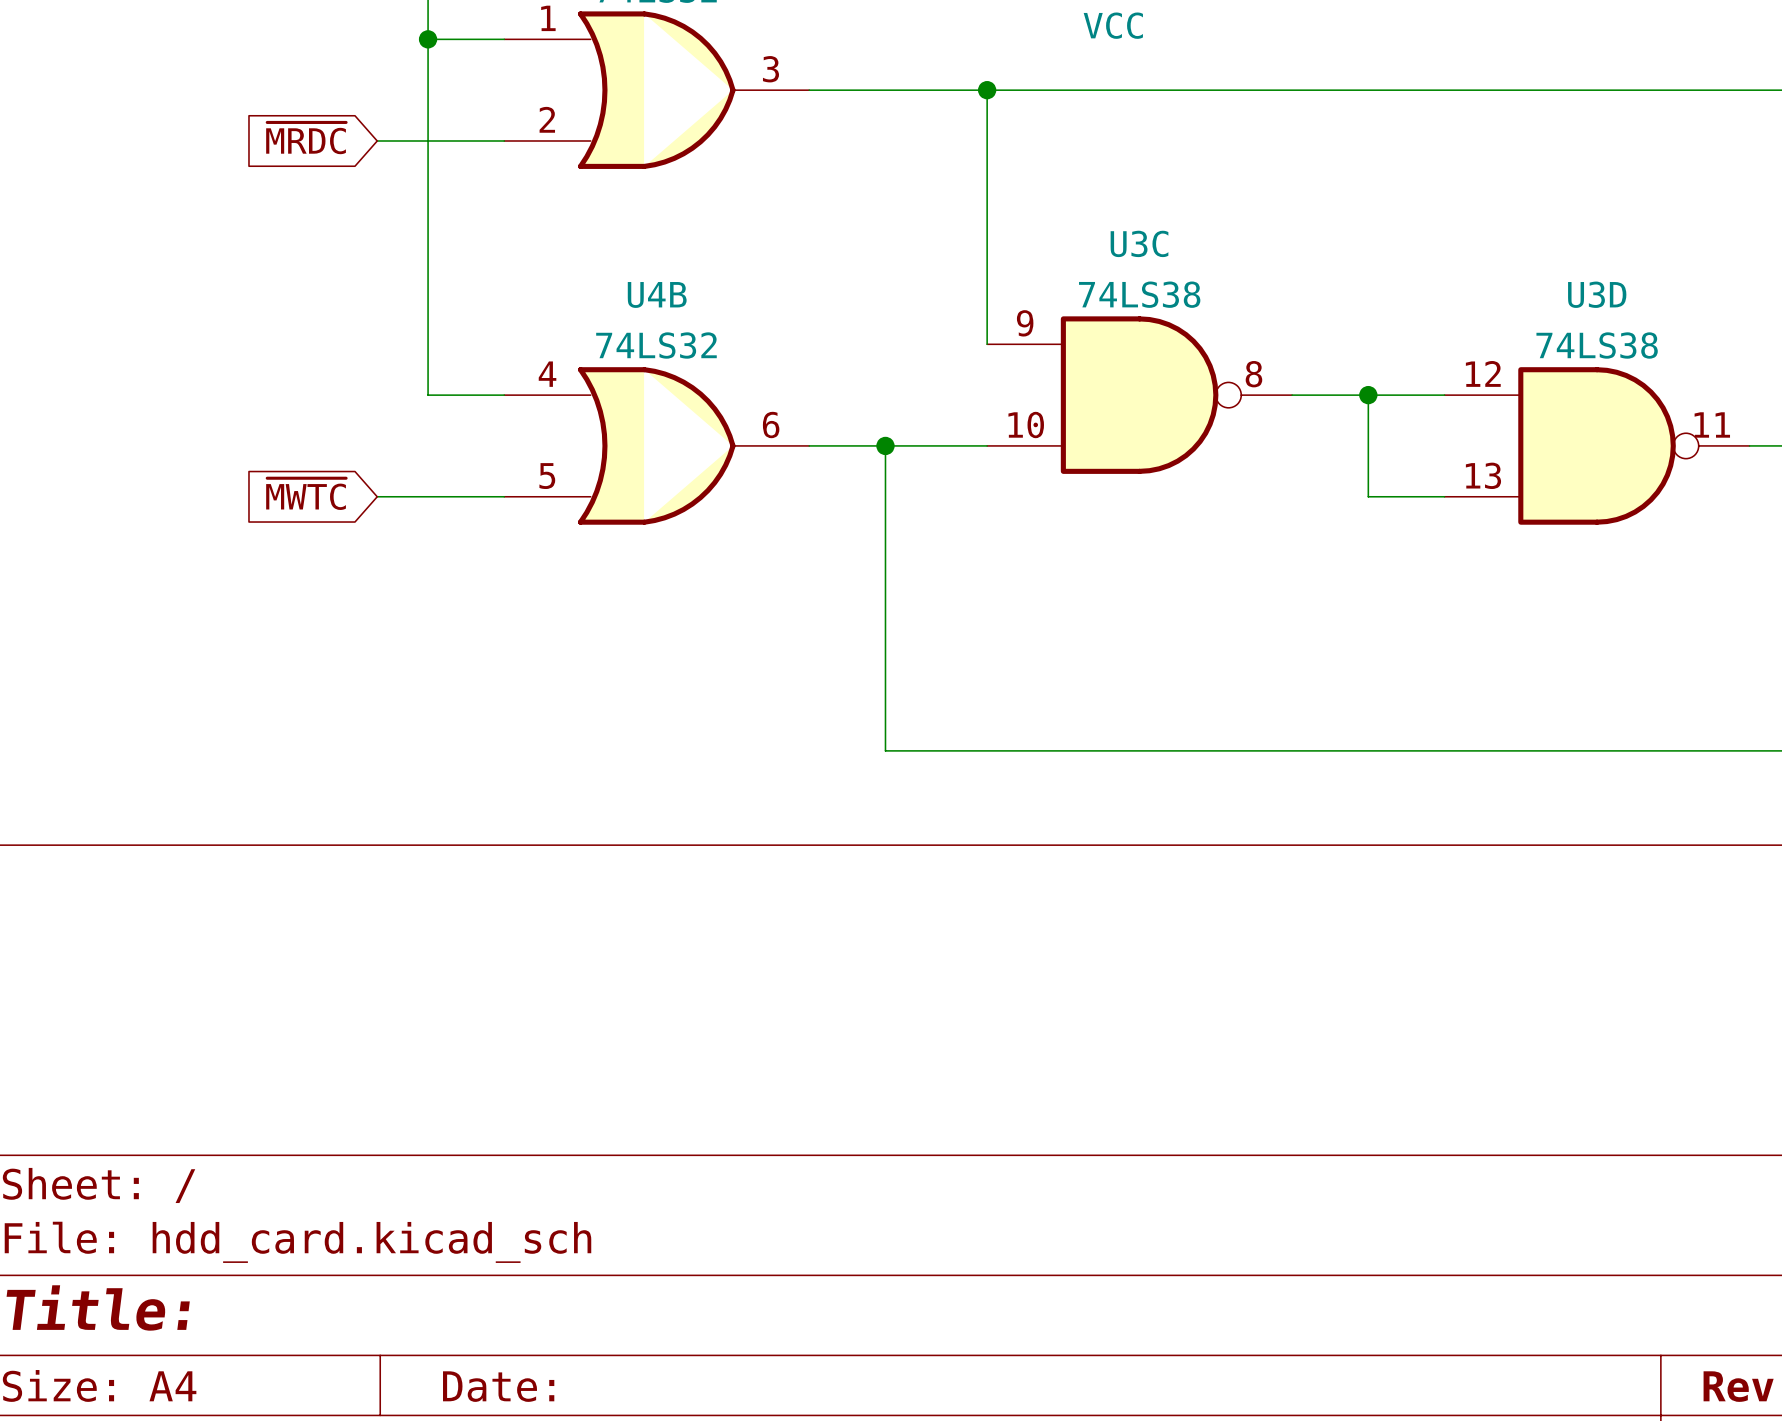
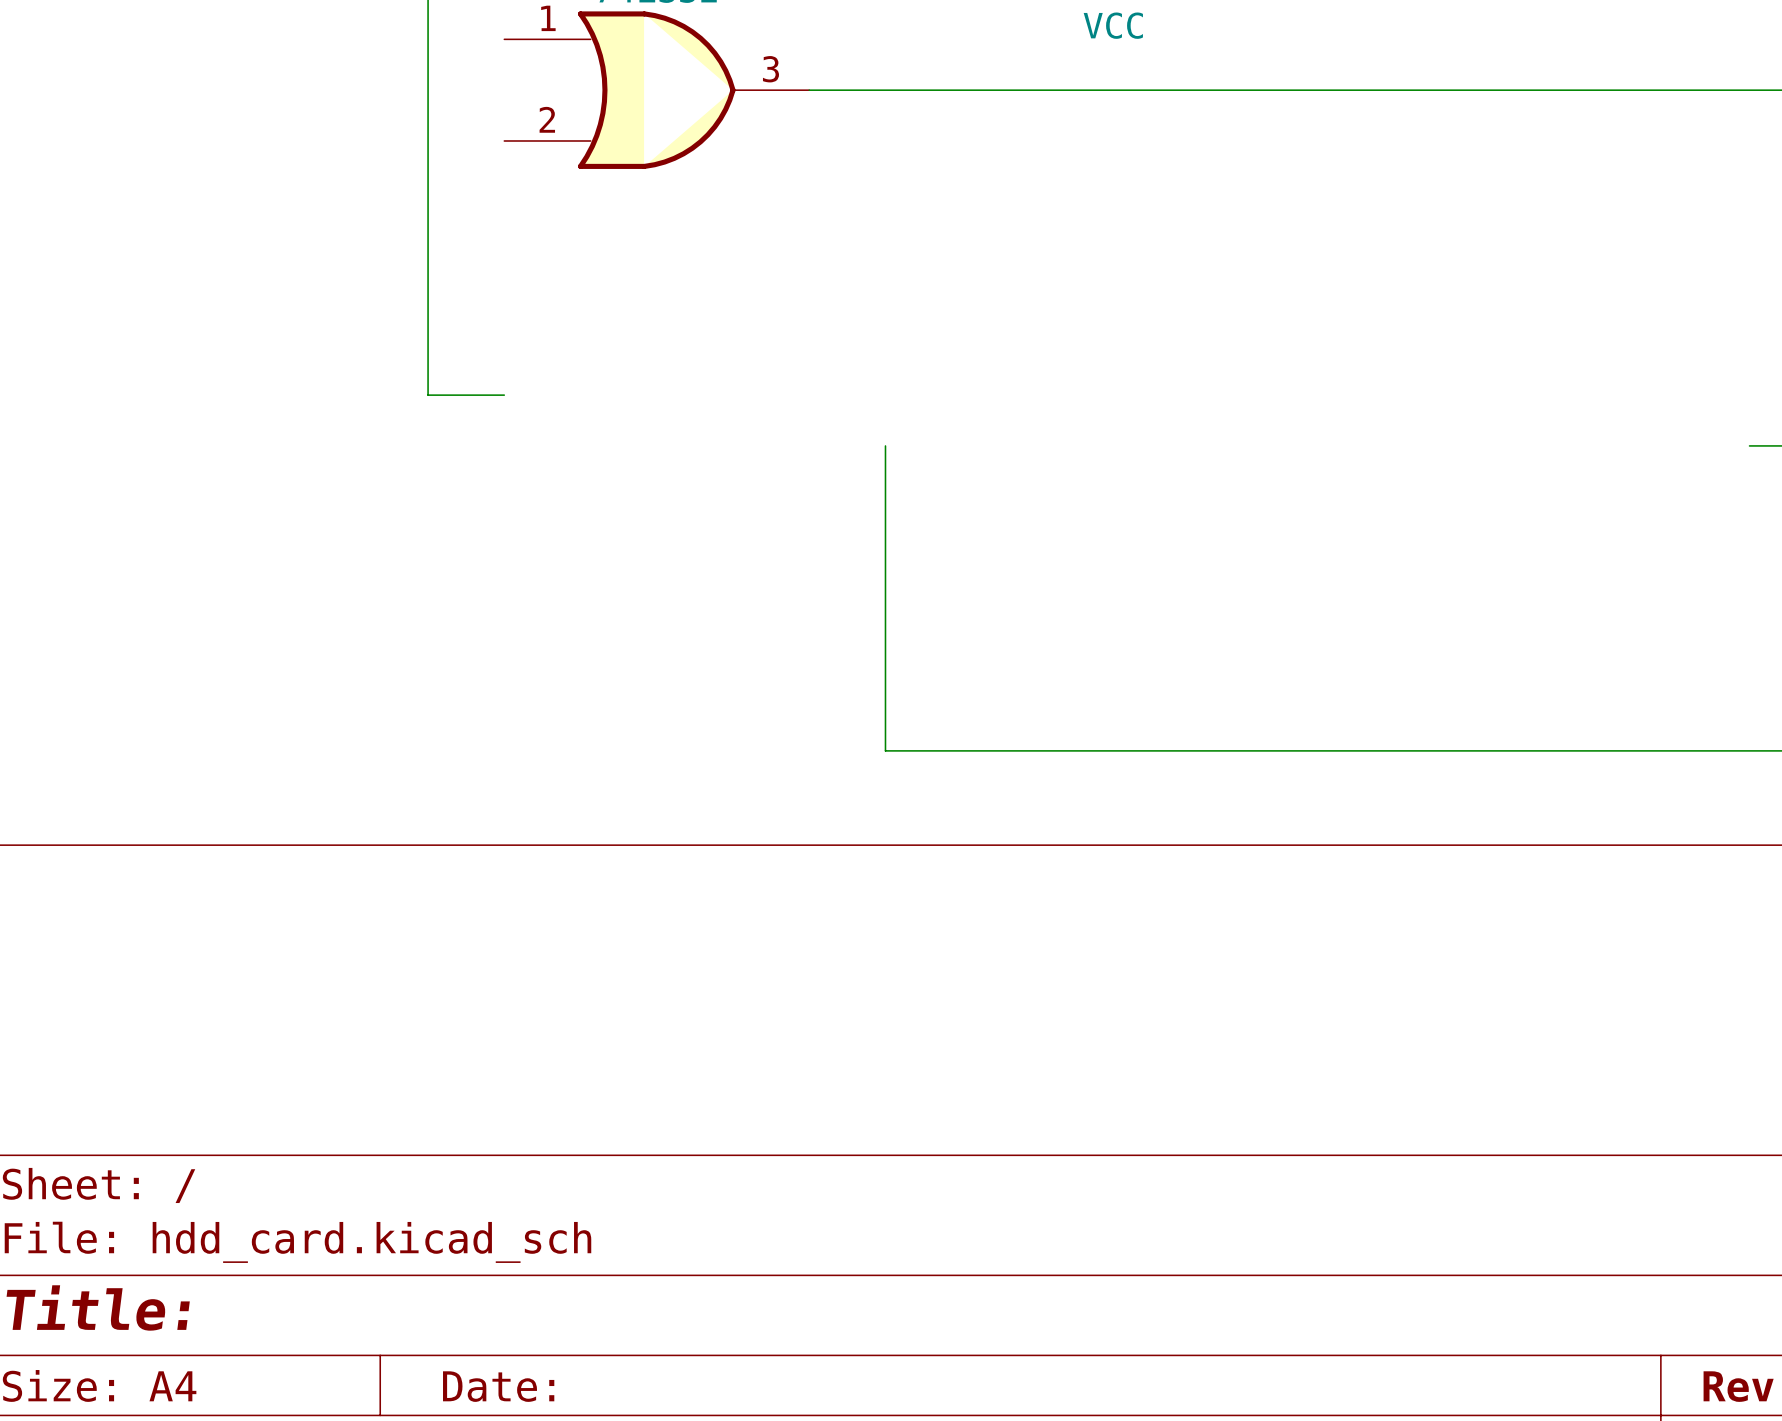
wire: (428, 39) (504, 39) -> none
junction: (428, 39) -> none
wire: (987, 90) (987, 344) -> none
junction: (987, 90) -> none
global label: ~{MRDC} (306, 138) -> none
wire: (377, 140) (504, 140) -> none
U3C: 74LS38 (1139, 395) -> none
wire: (1292, 395) (1444, 395) -> none
wire: (1368, 395) (1368, 496) (1444, 496) -> none
junction: (1368, 395) -> none
U4B: 74LS32 (656, 445) -> none
wire: (809, 445) (987, 445) -> none
junction: (885, 445) -> none
U3D: 74LS38 (1597, 445) -> none
global label: ~{MWTC} (306, 494) -> none
wire: (377, 496) (504, 496) -> none

